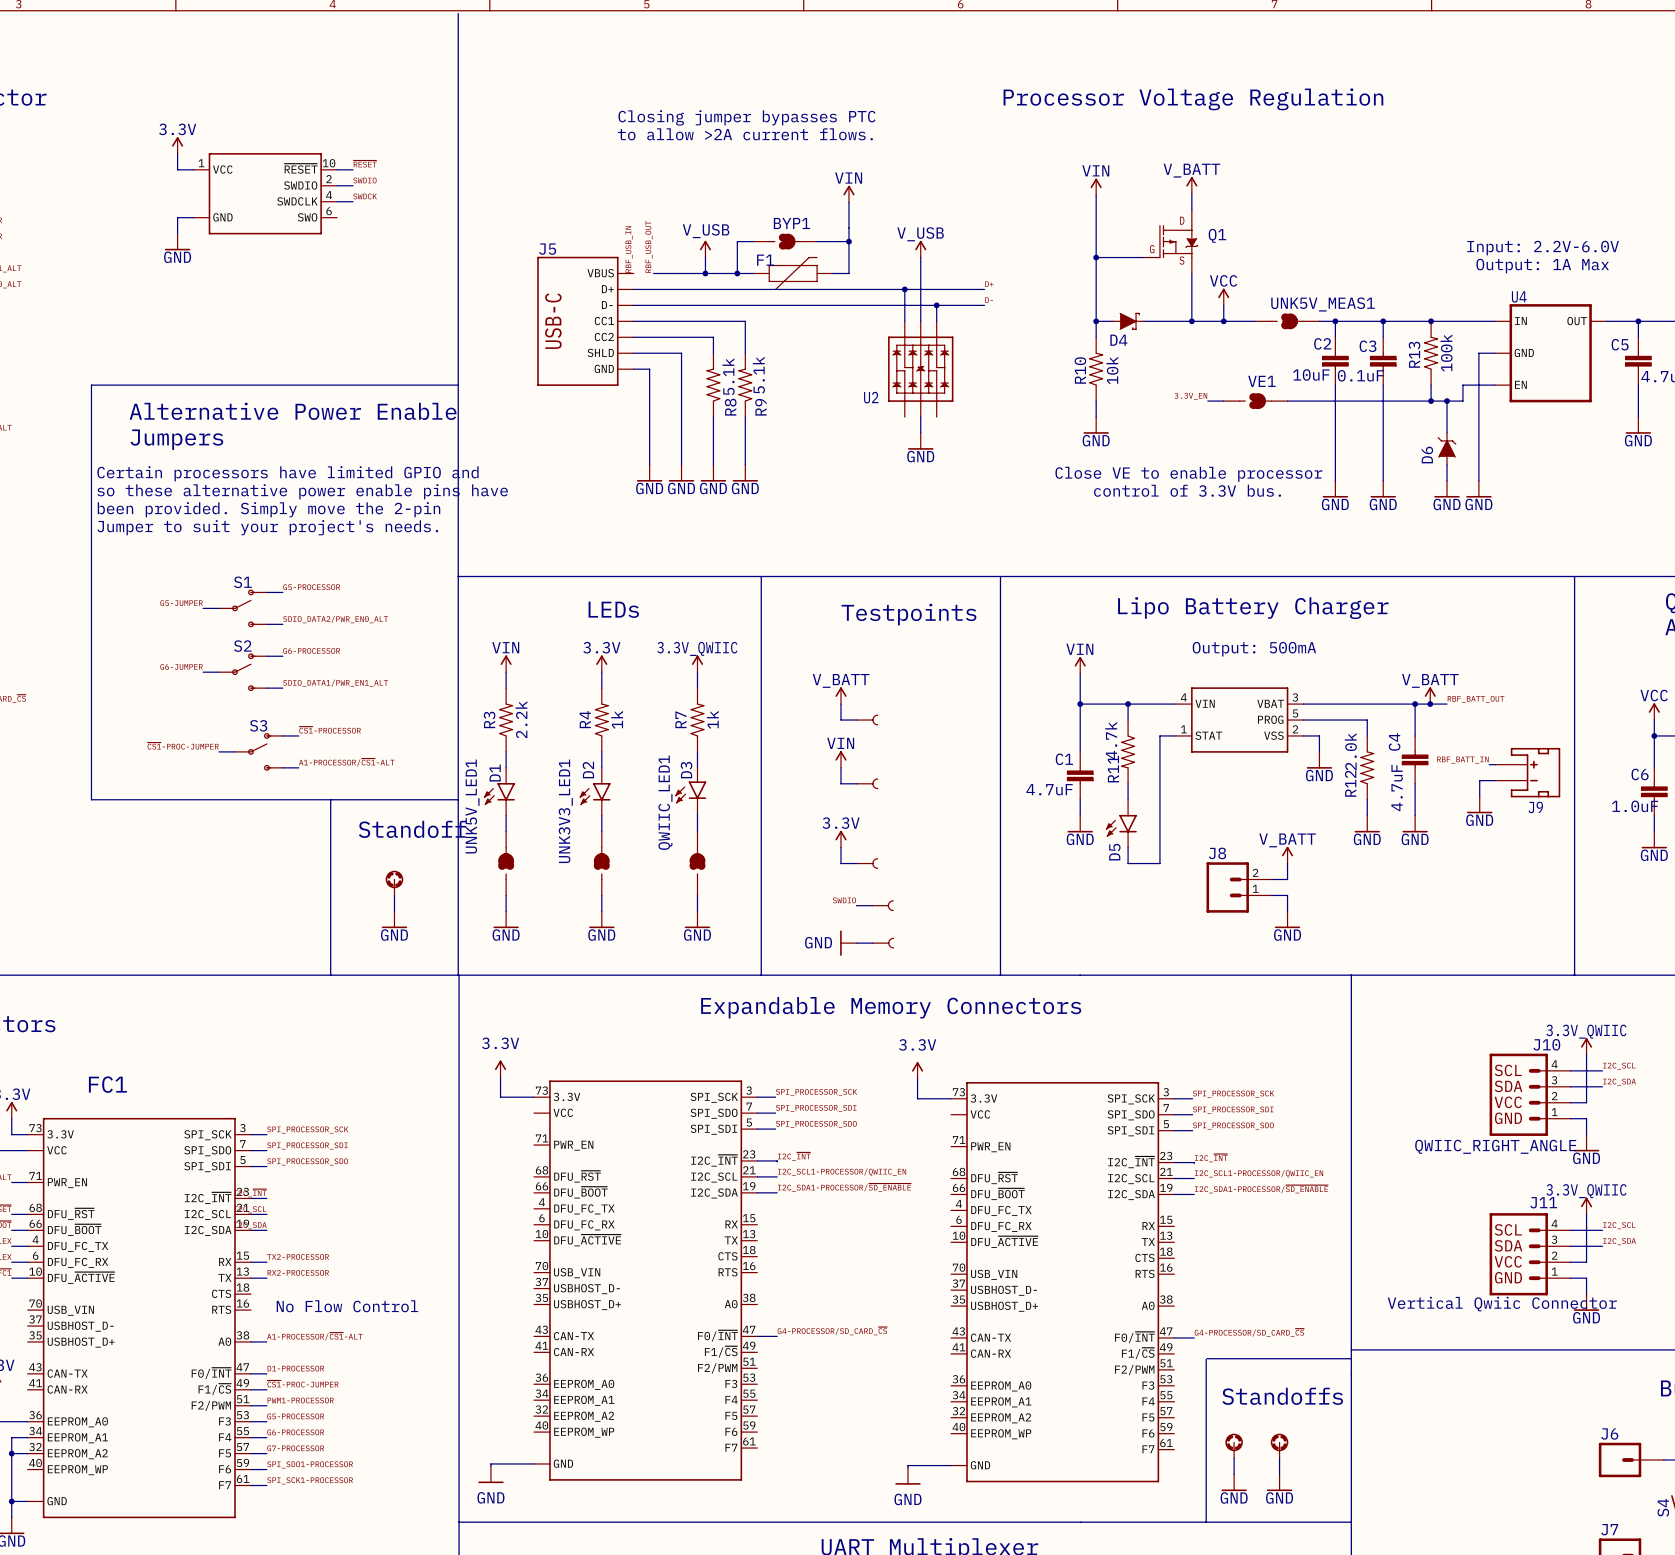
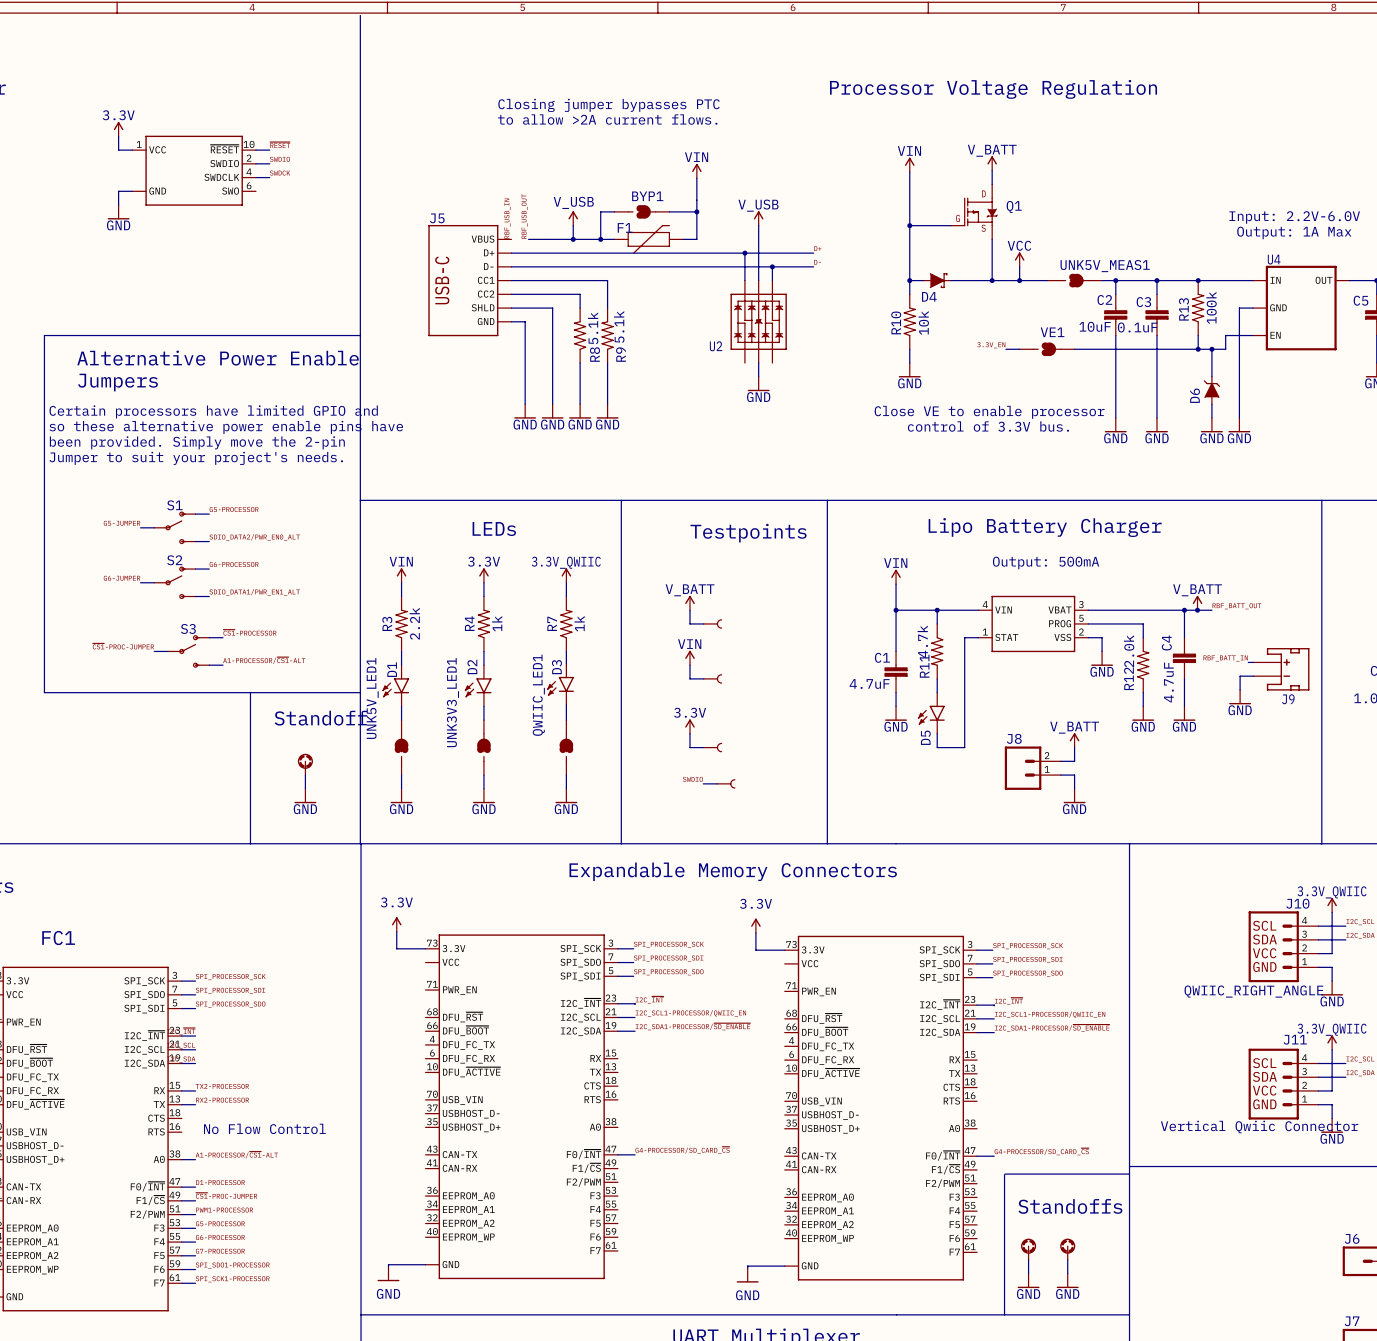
power symbol: GND (848, 943) -> none
wire: (856, 943) (872, 943) -> none
part: (883, 943) -> none

